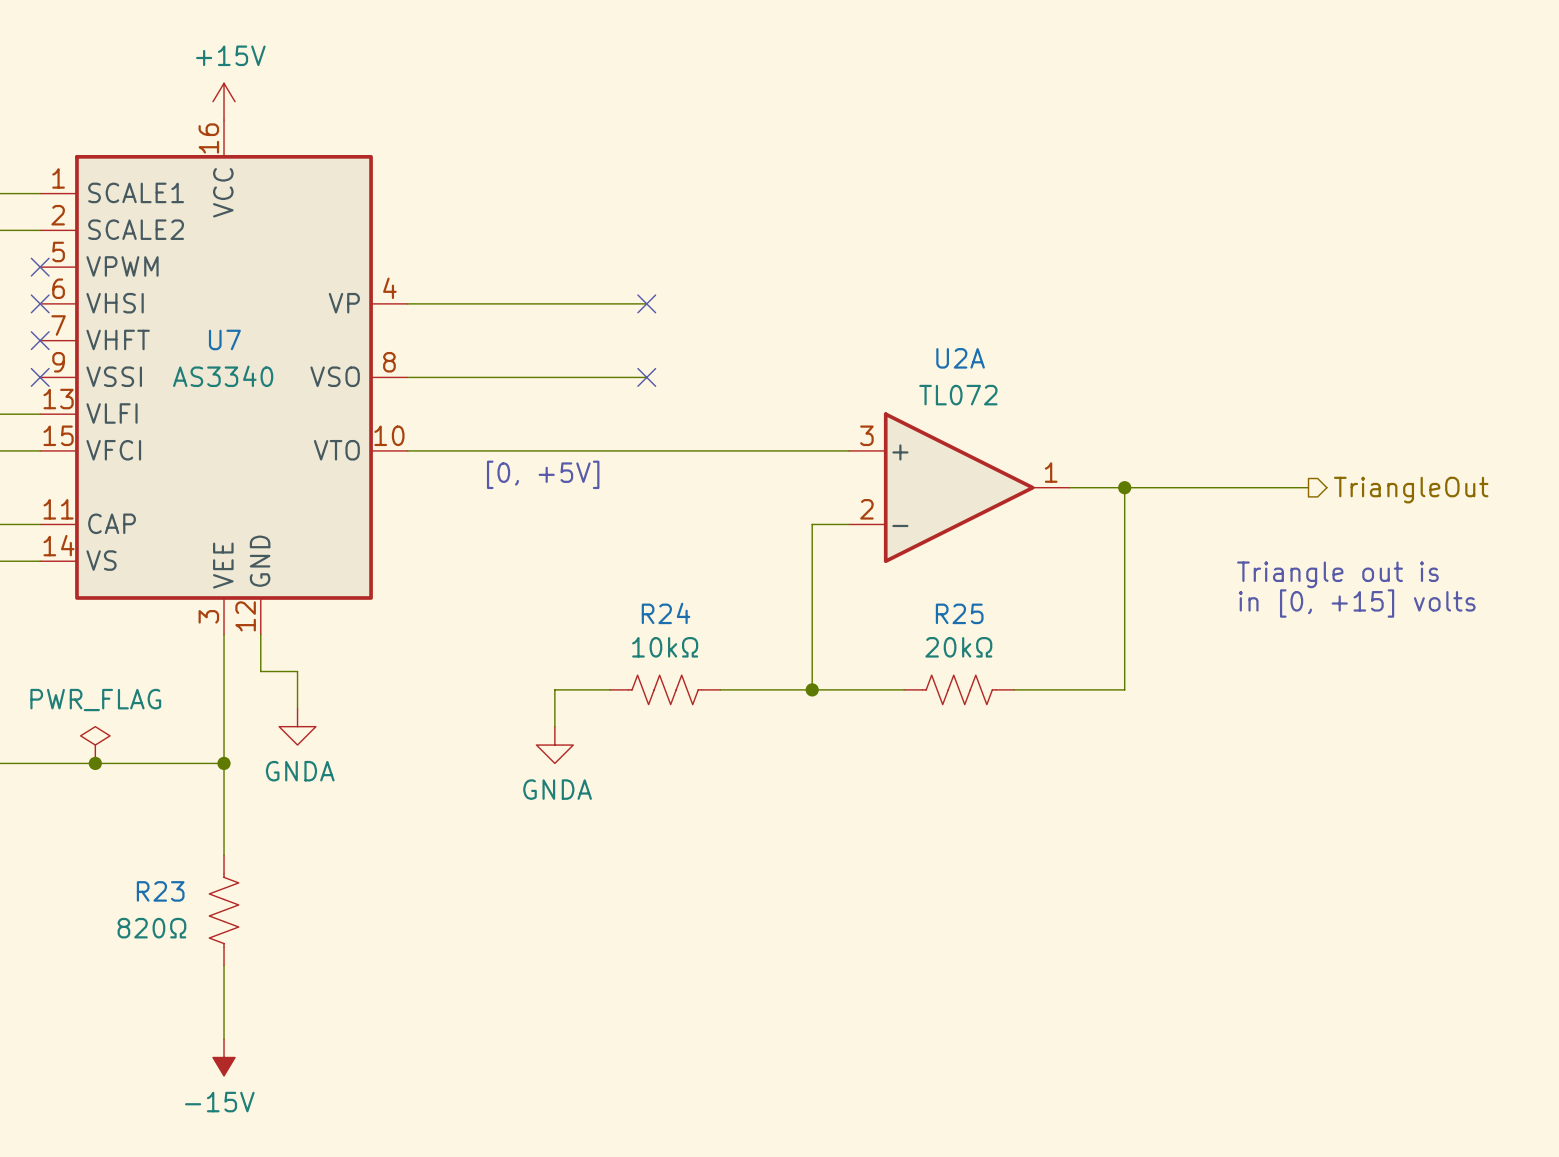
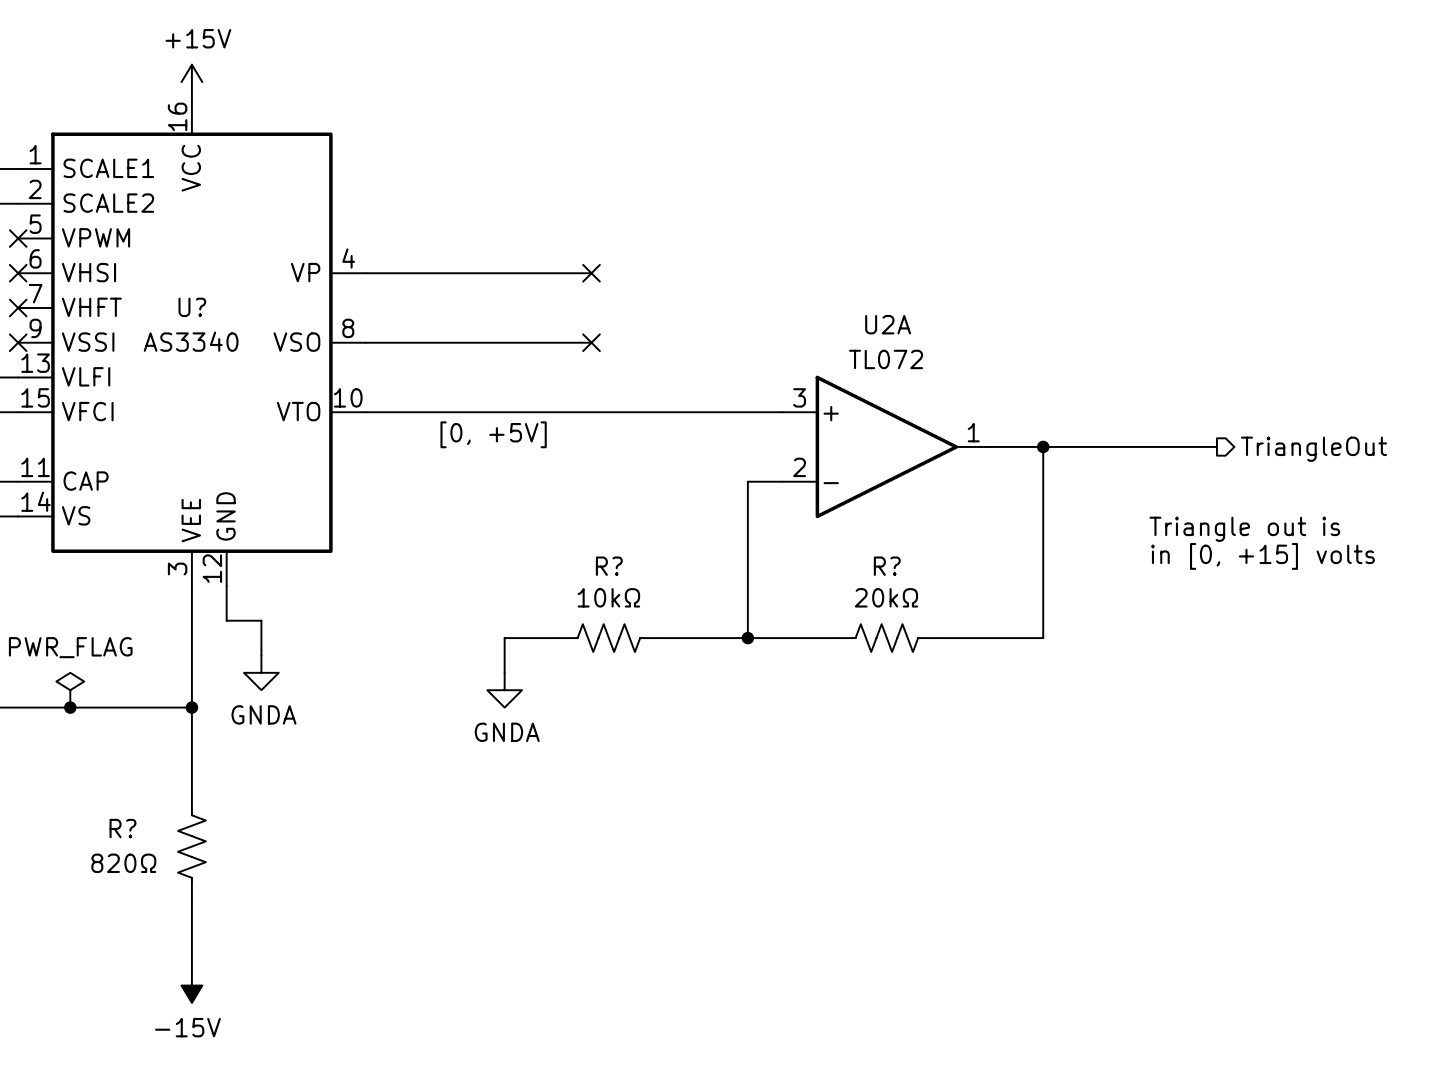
U7 name: U7 (224, 339) -> U? (192, 307)
R24 name: R24 (666, 613) -> R? (609, 566)
R25 name: R25 (959, 613) -> R? (887, 566)
R23 name: R23 (160, 891) -> R? (122, 828)

